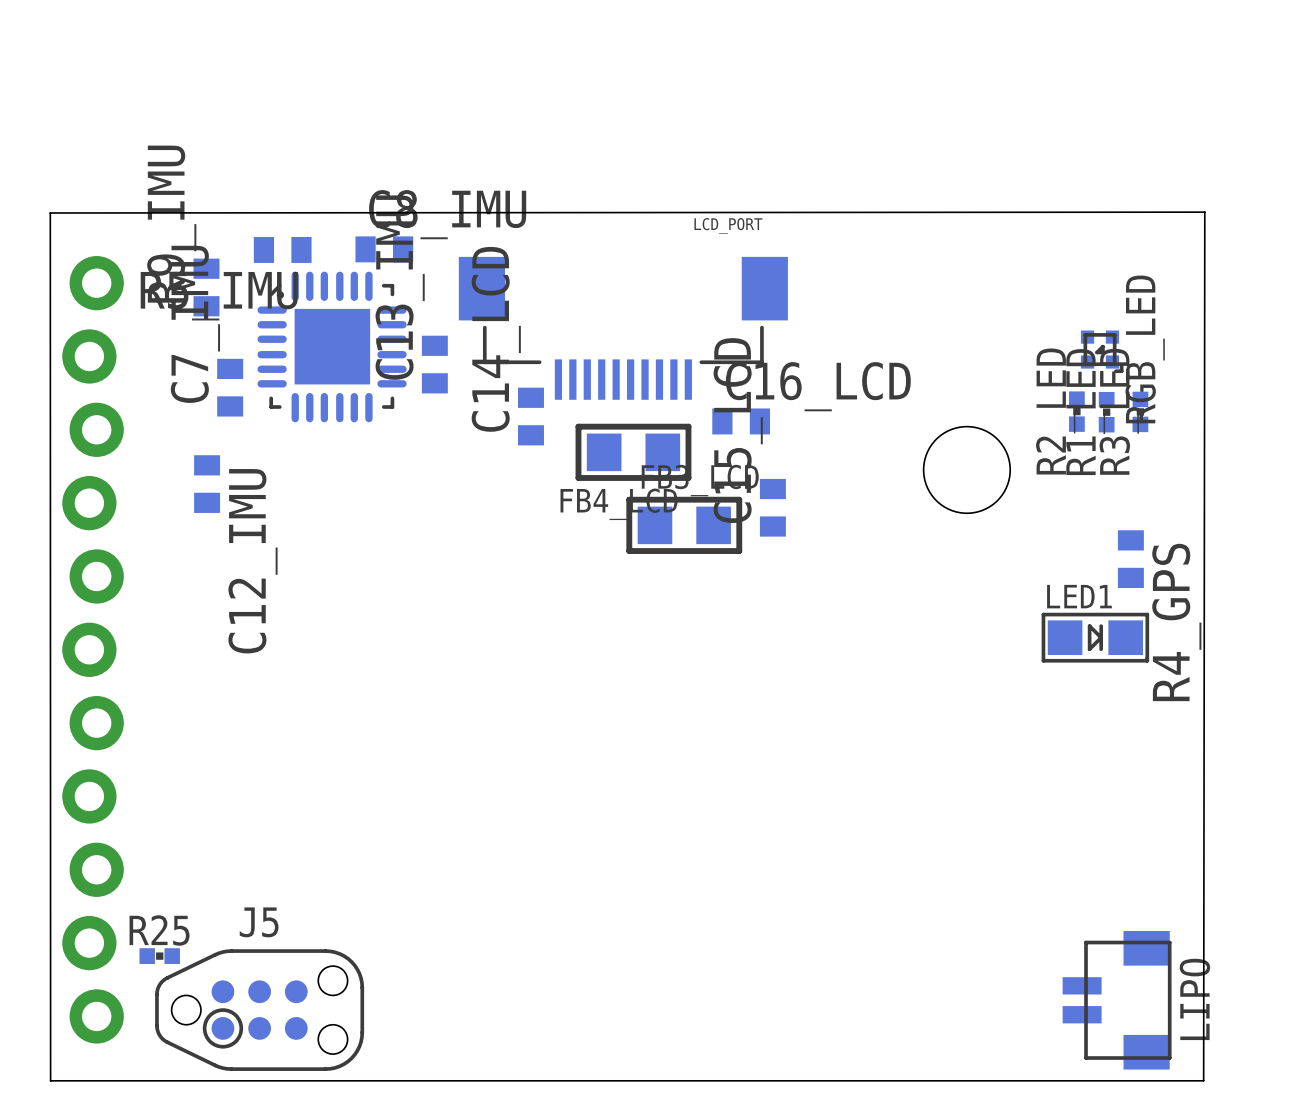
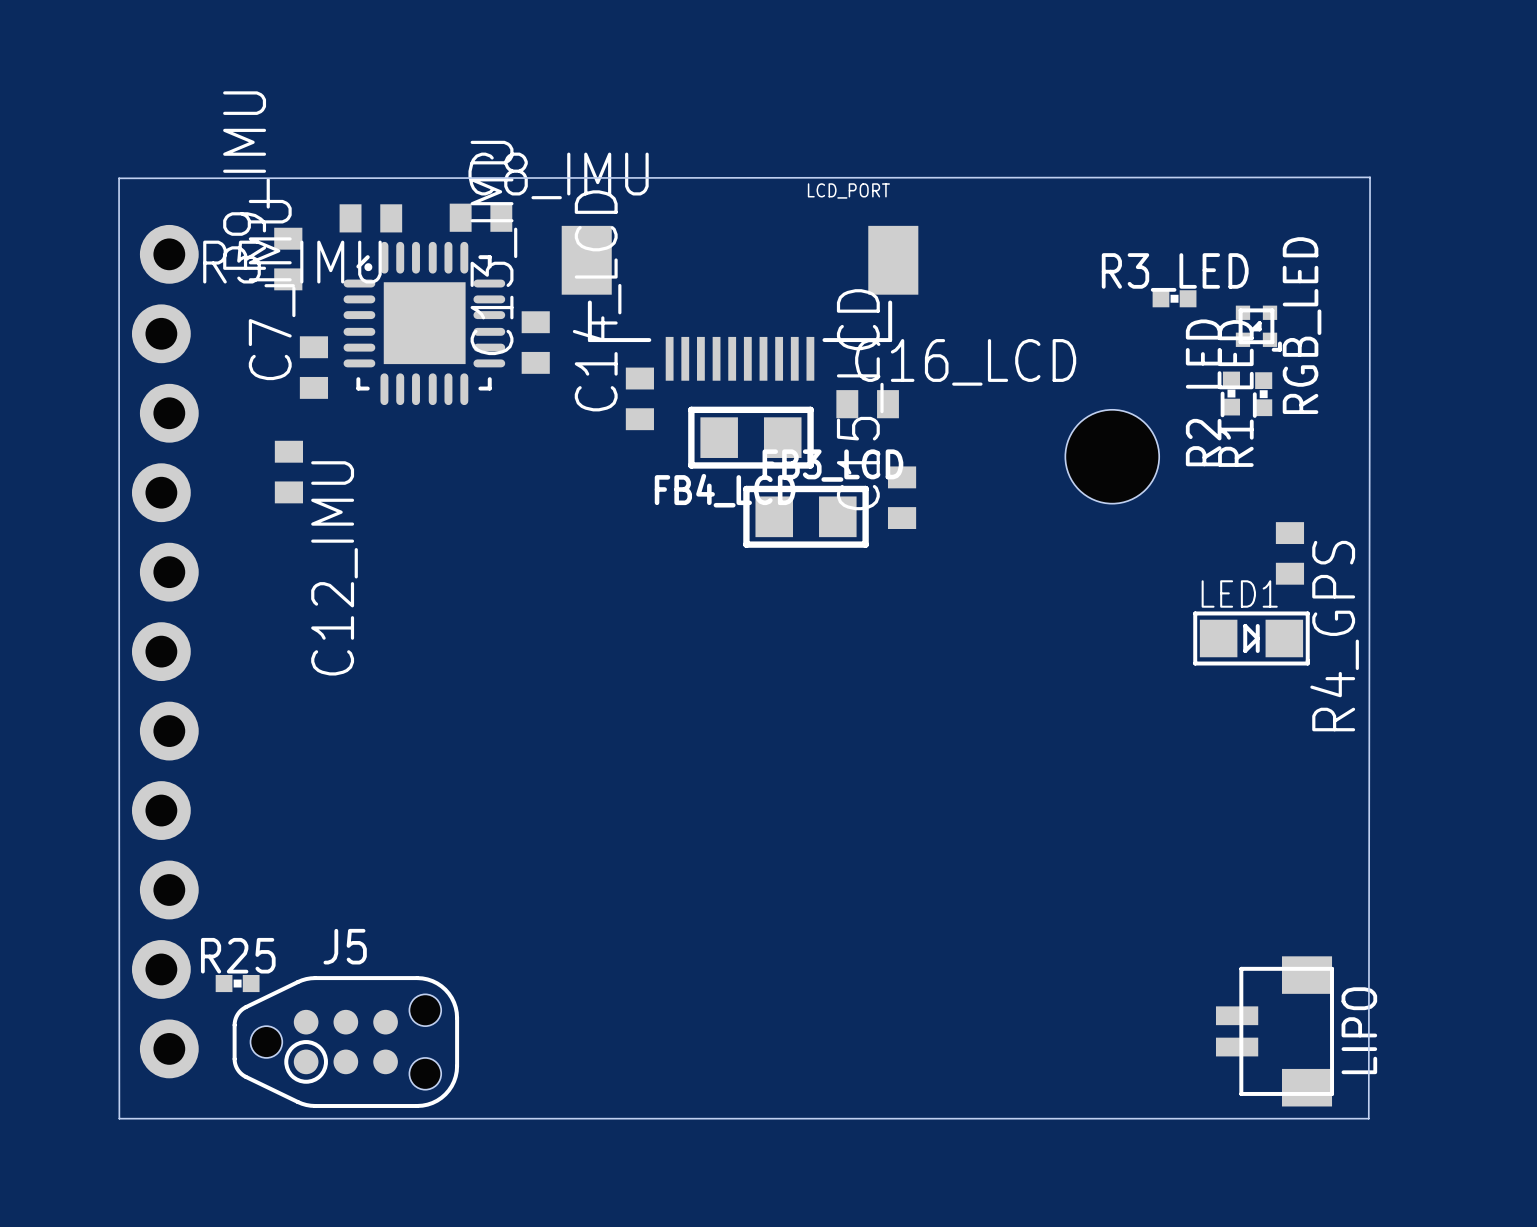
R3_LED rotation: 0° (1140, 411) -> 90° clockwise (1174, 298)
R3_LED position: (1140, 411) -> (1174, 298)

